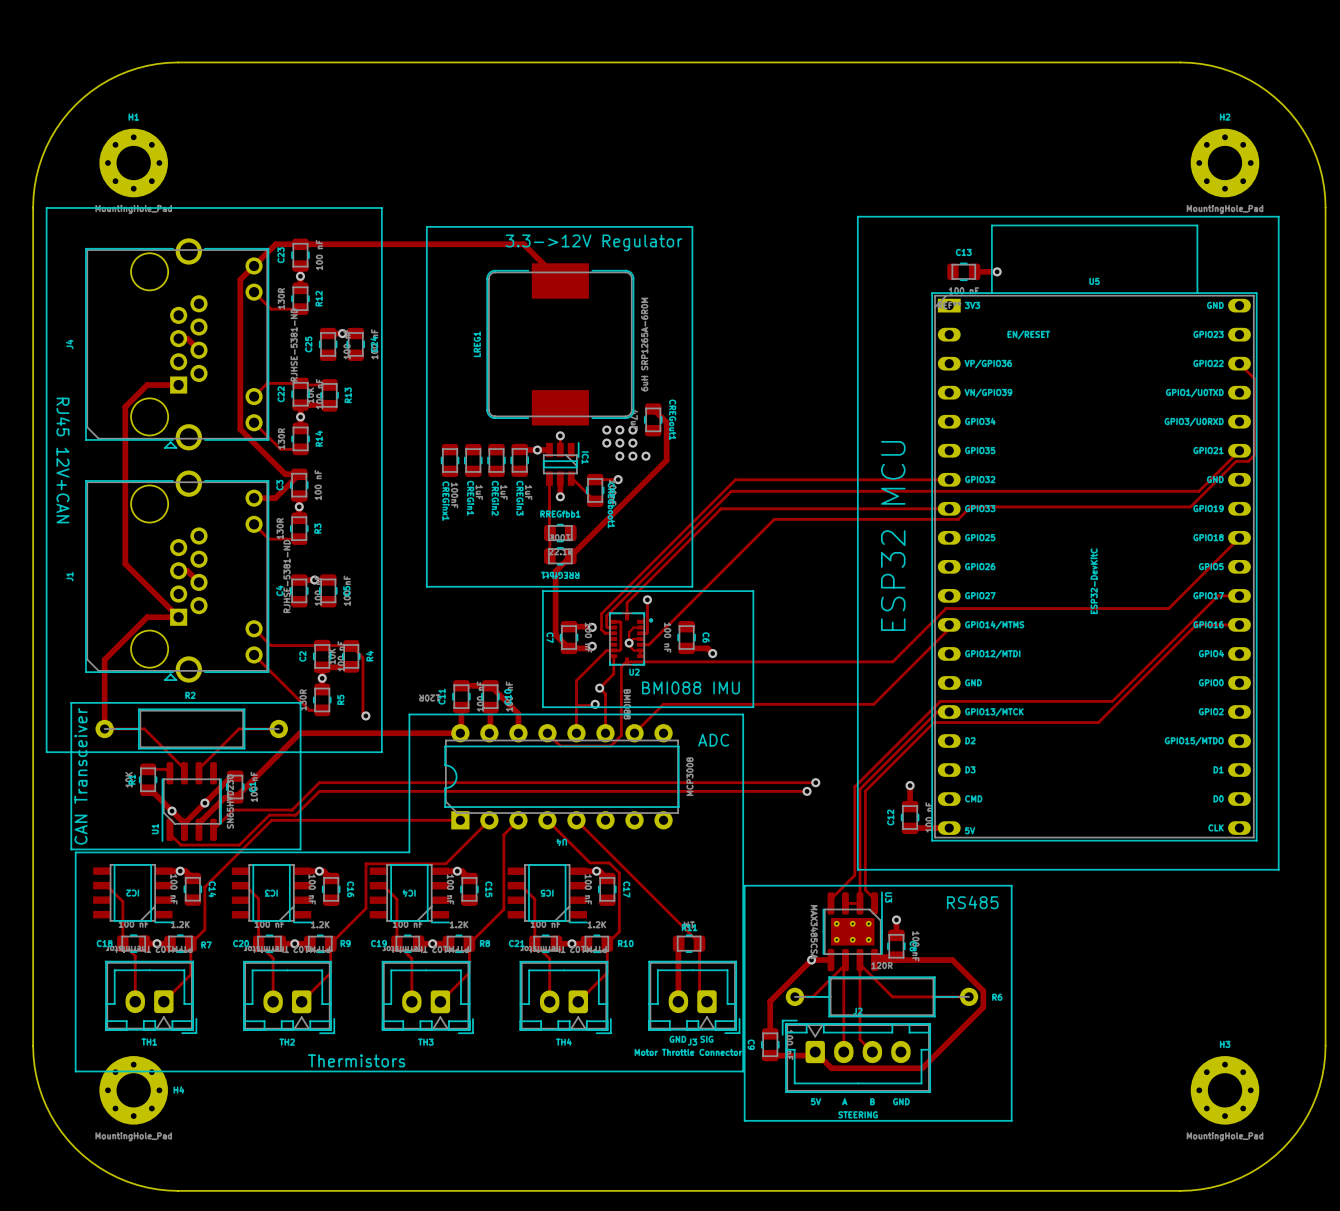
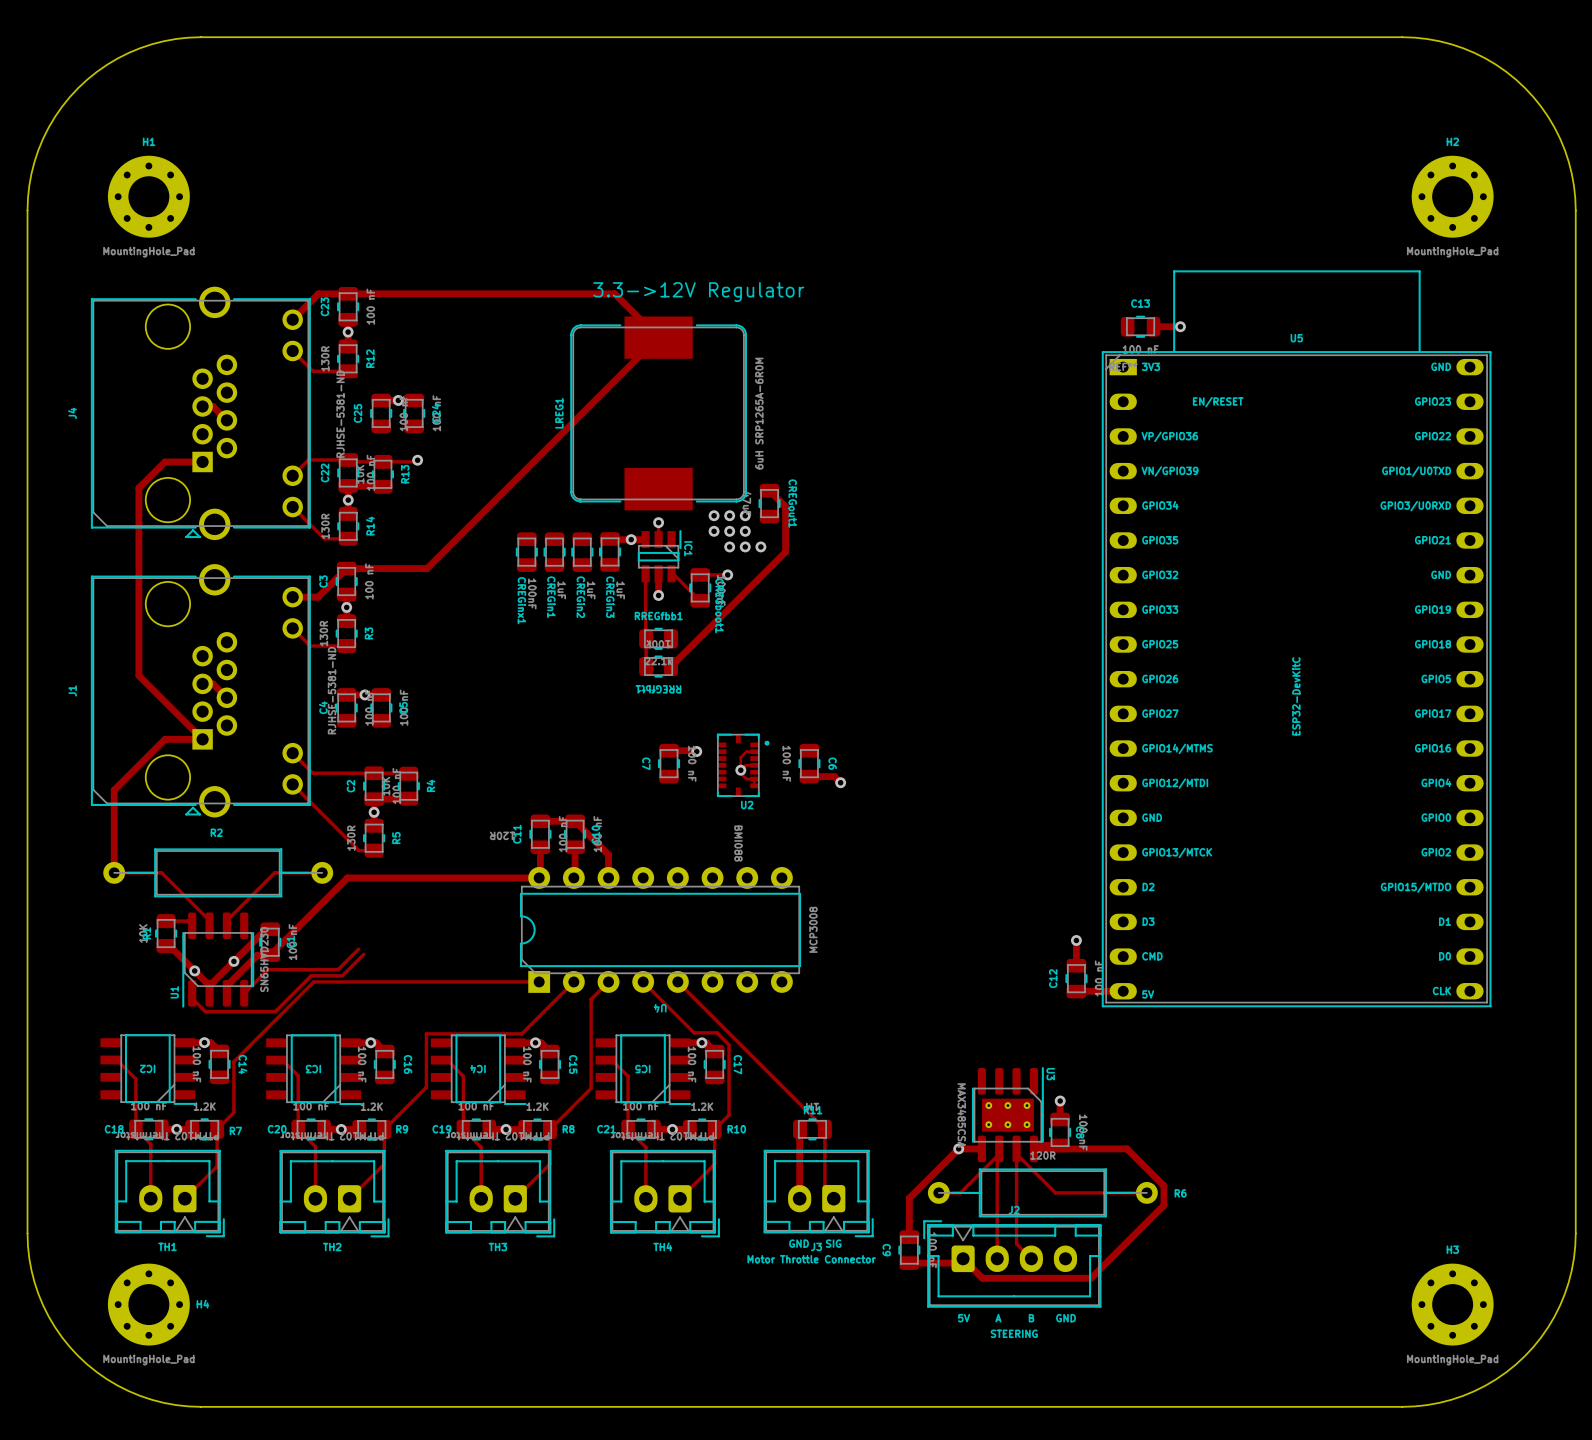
board edge: (178, 62) (1190, 62) (1221, 68) (1240, 75) (1258, 85) (1283, 104) (1302, 129) (1312, 147) (1322, 176) (1325, 207) (1325, 1056) (1319, 1086) (1312, 1106) (1302, 1124) (1283, 1148) (1258, 1167) (1240, 1177) (1221, 1185) (1190, 1190) (178, 1190) (147, 1187) (117, 1177) (91, 1161) (75, 1148) (62, 1132) (46, 1106) (39, 1086) (33, 1056) (33, 197) (39, 166) (46, 147) (56, 129) (75, 104) (99, 85) (117, 75) (147, 65) (178, 62) -> (200, 37) (176, 38) (140, 48) (107, 64) (78, 87) (62, 106) (43, 138) (31, 173) (27, 198) (27, 1245) (34, 1282) (43, 1305) (62, 1337) (78, 1356) (107, 1379) (128, 1391) (164, 1402) (200, 1406) (1414, 1406) (1439, 1402) (1474, 1391) (1496, 1379) (1524, 1356) (1548, 1327) (1564, 1294) (1571, 1270) (1575, 1233) (1575, 198) (1571, 173) (1560, 138) (1541, 106) (1524, 87) (1506, 71) (1474, 52) (1451, 44) (1414, 37) (200, 37)
line: (46, 207) (381, 207) (381, 752) (46, 752) (46, 207) -> none
line: (857, 216) (1278, 216) (1278, 869) (857, 869) (857, 216) -> none
line: (426, 226) (692, 226) (692, 586) (426, 586) (426, 226) -> none
track: (254, 265) (240, 279) (240, 429) (285, 474) (299, 474) -> (658, 337) (427, 568) (346, 568)
track: (1239, 363) (1254, 378) (1254, 455) (1248, 461) (1236, 461) (1190, 506) (970, 506) (958, 519) (774, 519) (648, 644) (640, 644) -> none
track: none -> (417, 460) (415, 461) (382, 461)
via: none -> (417, 460)
track: (1239, 450) (1199, 491) (731, 491) (606, 615) (606, 626) (613, 627) -> none
text: RJ45 12V+CAN (63, 460) -> none
track: (949, 479) (735, 479) (601, 613) (601, 629) (605, 633) (613, 633) -> none
track: (949, 508) (721, 508) (627, 602) (627, 617) -> none
text: ESP32 MCU (893, 535) -> none
track: (1239, 537) (1168, 608) (946, 608) (892, 661) (627, 660) (621, 666) (621, 735) (610, 746) (560, 746) (547, 733) -> none
track: (570, 556) (555, 571) (555, 634) (569, 648) (590, 648) (592, 646) -> none
line: (542, 591) (753, 591) (753, 707) (542, 707) (542, 591) -> none
track: (1239, 595) (1217, 595) (1112, 701) (940, 701) (854, 786) (854, 875) (830, 899) (830, 903) -> none
track: (647, 599) (647, 632) (640, 633) -> none
via: (647, 599) -> none
track: (613, 621) (620, 622) (620, 649) (606, 650) (576, 680) (576, 733) -> none
track: (949, 624) (949, 628) (873, 704) (663, 704) (634, 733) -> none
track: (1239, 624) (1196, 624) (1098, 722) (933, 722) (865, 791) (865, 890) (874, 899) (874, 903) -> none
track: (351, 646) (362, 657) (362, 713) (365, 715) -> none
via: (592, 646) -> none
track: (613, 656) (613, 673) (599, 688) (605, 693) (605, 733) -> none
text: BMI088 IMU (690, 687) -> none
via: (599, 688) -> none
line: (71, 702) (300, 702) (300, 849) (71, 849) (71, 702) -> none
track: (595, 704) (576, 705) -> none
via: (595, 704) -> none
track: (949, 711) (937, 711) (859, 789) (859, 903) (845, 903) -> none
line: (409, 714) (409, 852) (75, 852) (75, 1071) (743, 1071) (743, 714) (409, 714) -> none
via: (365, 715) -> none
text: ADC (713, 740) -> none
text: CAN Transceiver (81, 776) -> none
track: (815, 782) (319, 782) (309, 792) -> none
via: (815, 782) -> none
track: (807, 791) (319, 791) (313, 797) -> none
via: (807, 791) -> none
line: (744, 885) (1011, 885) (1011, 1120) (744, 1120) (744, 885) -> none
text: RS485 (972, 902) -> none
text: Thermistors (356, 1060) -> none

